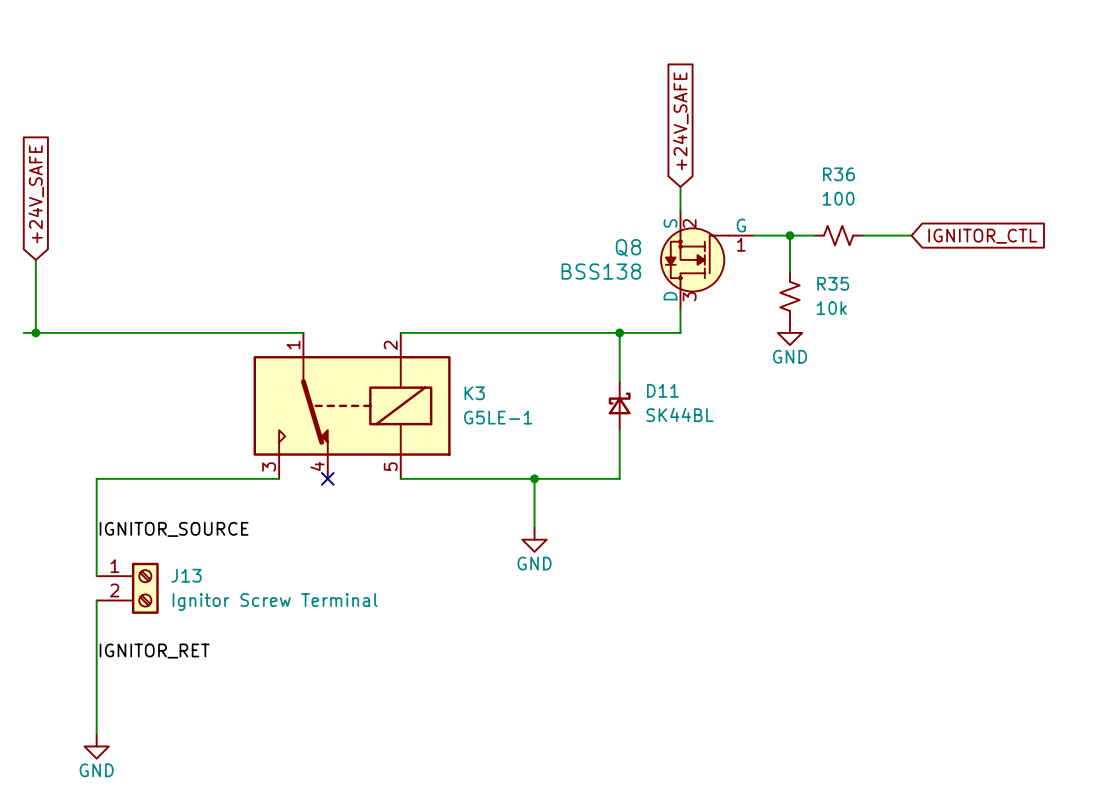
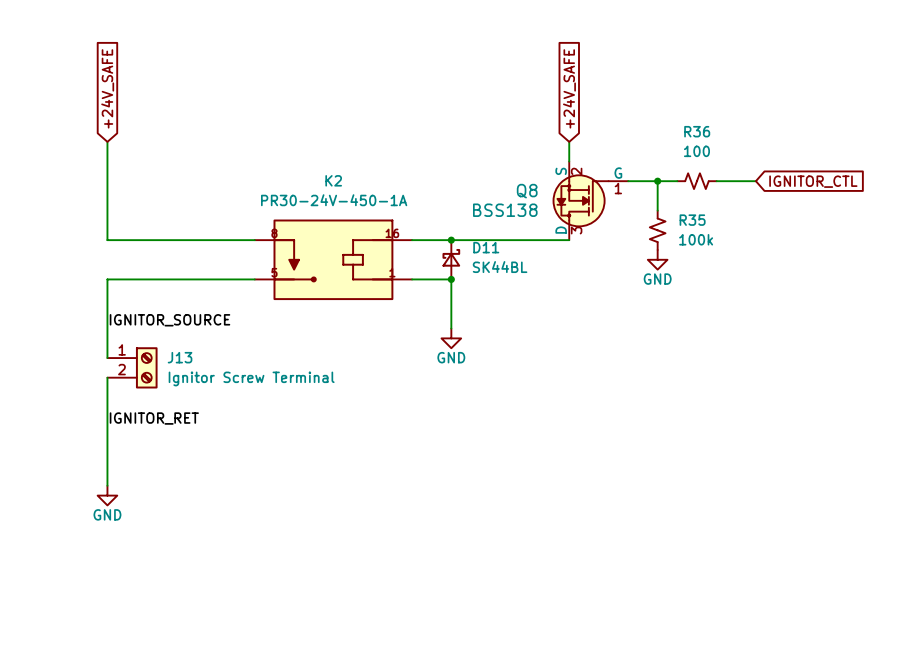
wire: none -> (107, 141) (107, 240) (254, 240)
global label position: +24V_SAFE (36, 194) -> +24V_SAFE (107, 88)
wire: (35, 259) (35, 332) -> none
junction: none -> (451, 240)
wire: (680, 308) (680, 332) (400, 332) -> (569, 240) (412, 240)
R35 value: 10k (831, 308) -> 100k (696, 239)
wire: (23, 332) (303, 332) -> none
junction: (35, 332) -> none
K2: none -> PR30-24V-450-1A (333, 259)
wire: (619, 332) (619, 381) -> none
junction: (619, 332) -> none
wire: none -> (412, 279) (451, 279) (451, 328)
junction: none -> (451, 279)
K3: G5LE-1 (352, 405) -> none
D11 position: (619, 405) -> (451, 259)
wire: (619, 430) (619, 478) (400, 478) -> none
wire: (279, 478) (96, 478) (96, 576) -> (254, 279) (107, 279) (107, 358)
no-connect mark: (327, 478) -> none
wire: (534, 478) (534, 527) -> none
junction: (534, 478) -> none
label position: IGNITOR_SOURCE (174, 529) -> IGNITOR_SOURCE (169, 320)
power symbol position: GND (534, 539) -> GND (451, 338)
J13 position: (127, 588) -> (132, 367)
wire: (96, 600) (96, 734) -> (107, 377) (107, 485)
label position: IGNITOR_RET (154, 651) -> IGNITOR_RET (154, 418)
power symbol position: GND (96, 746) -> GND (107, 495)

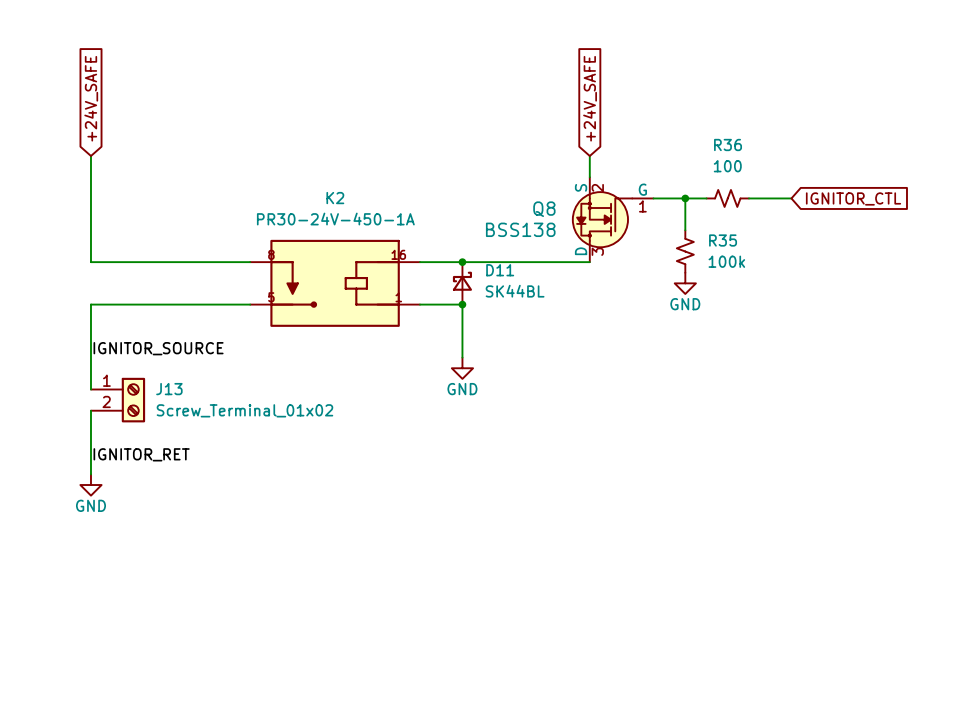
J13 value: Ignitor Screw Terminal (251, 378) -> Screw_Terminal_01x02 (244, 410)
wire: (107, 436) (107, 485) -> none
power symbol position: GND (107, 495) -> GND (90, 485)

